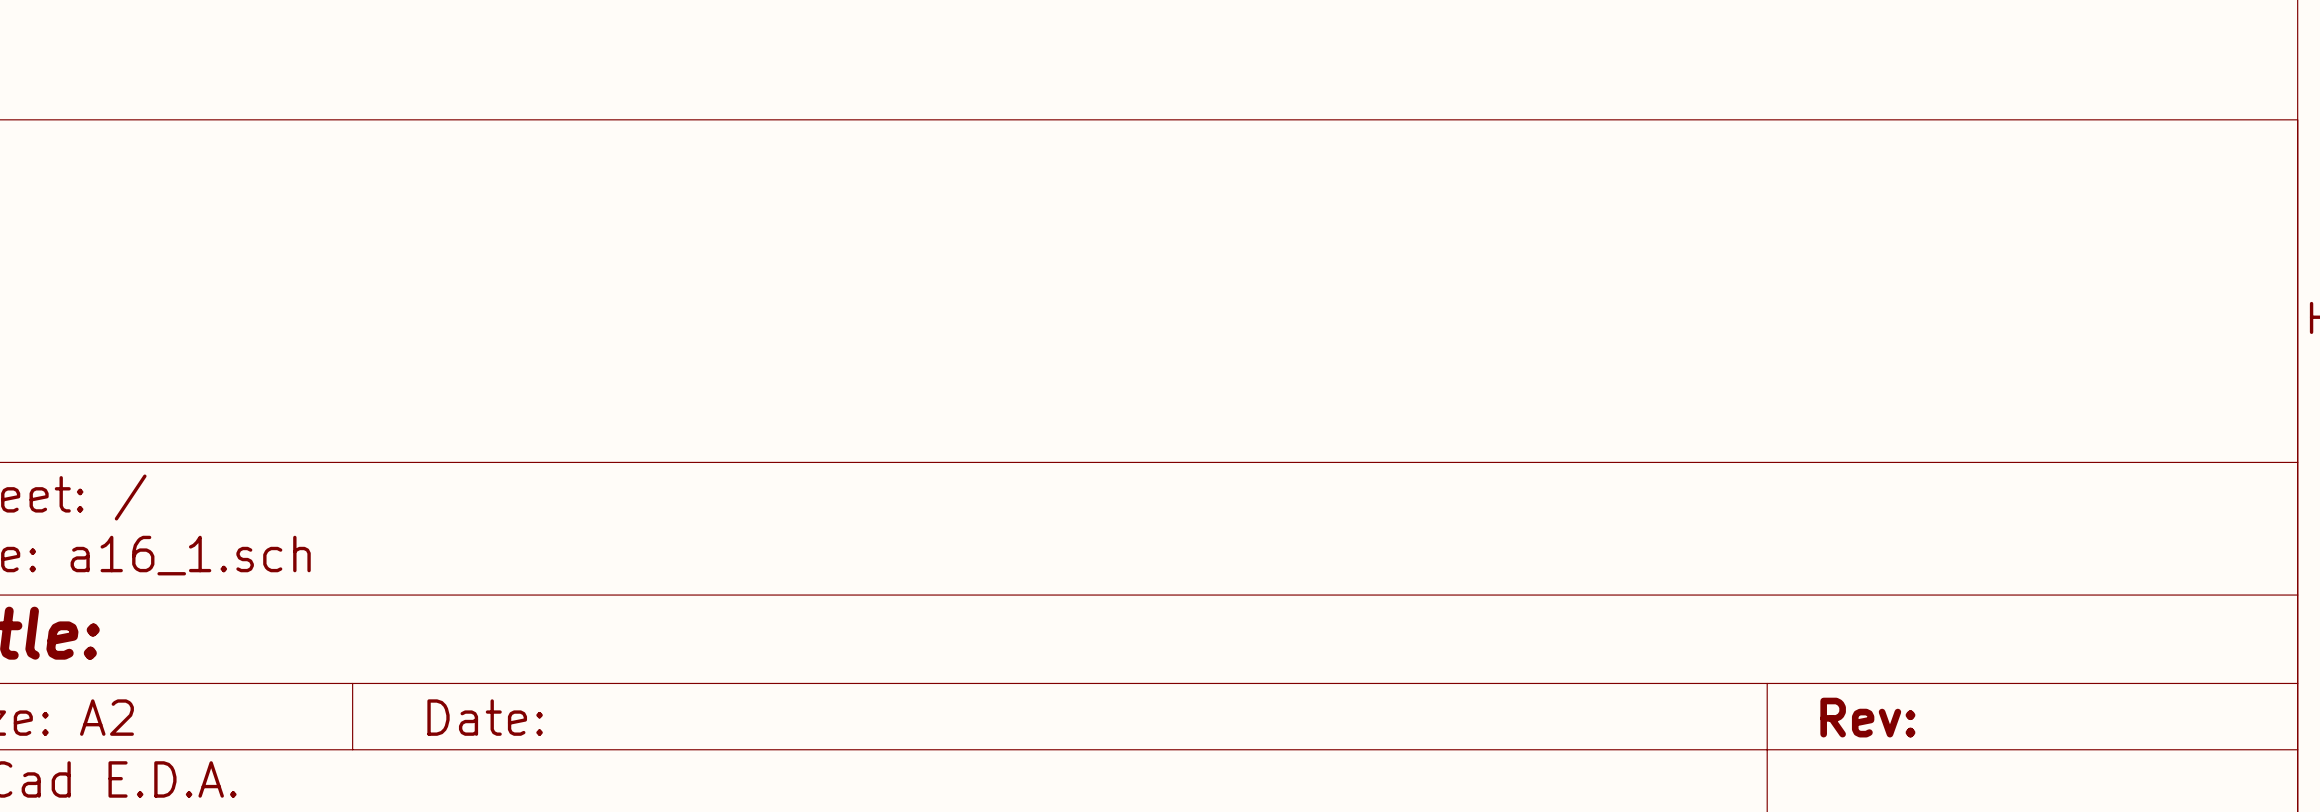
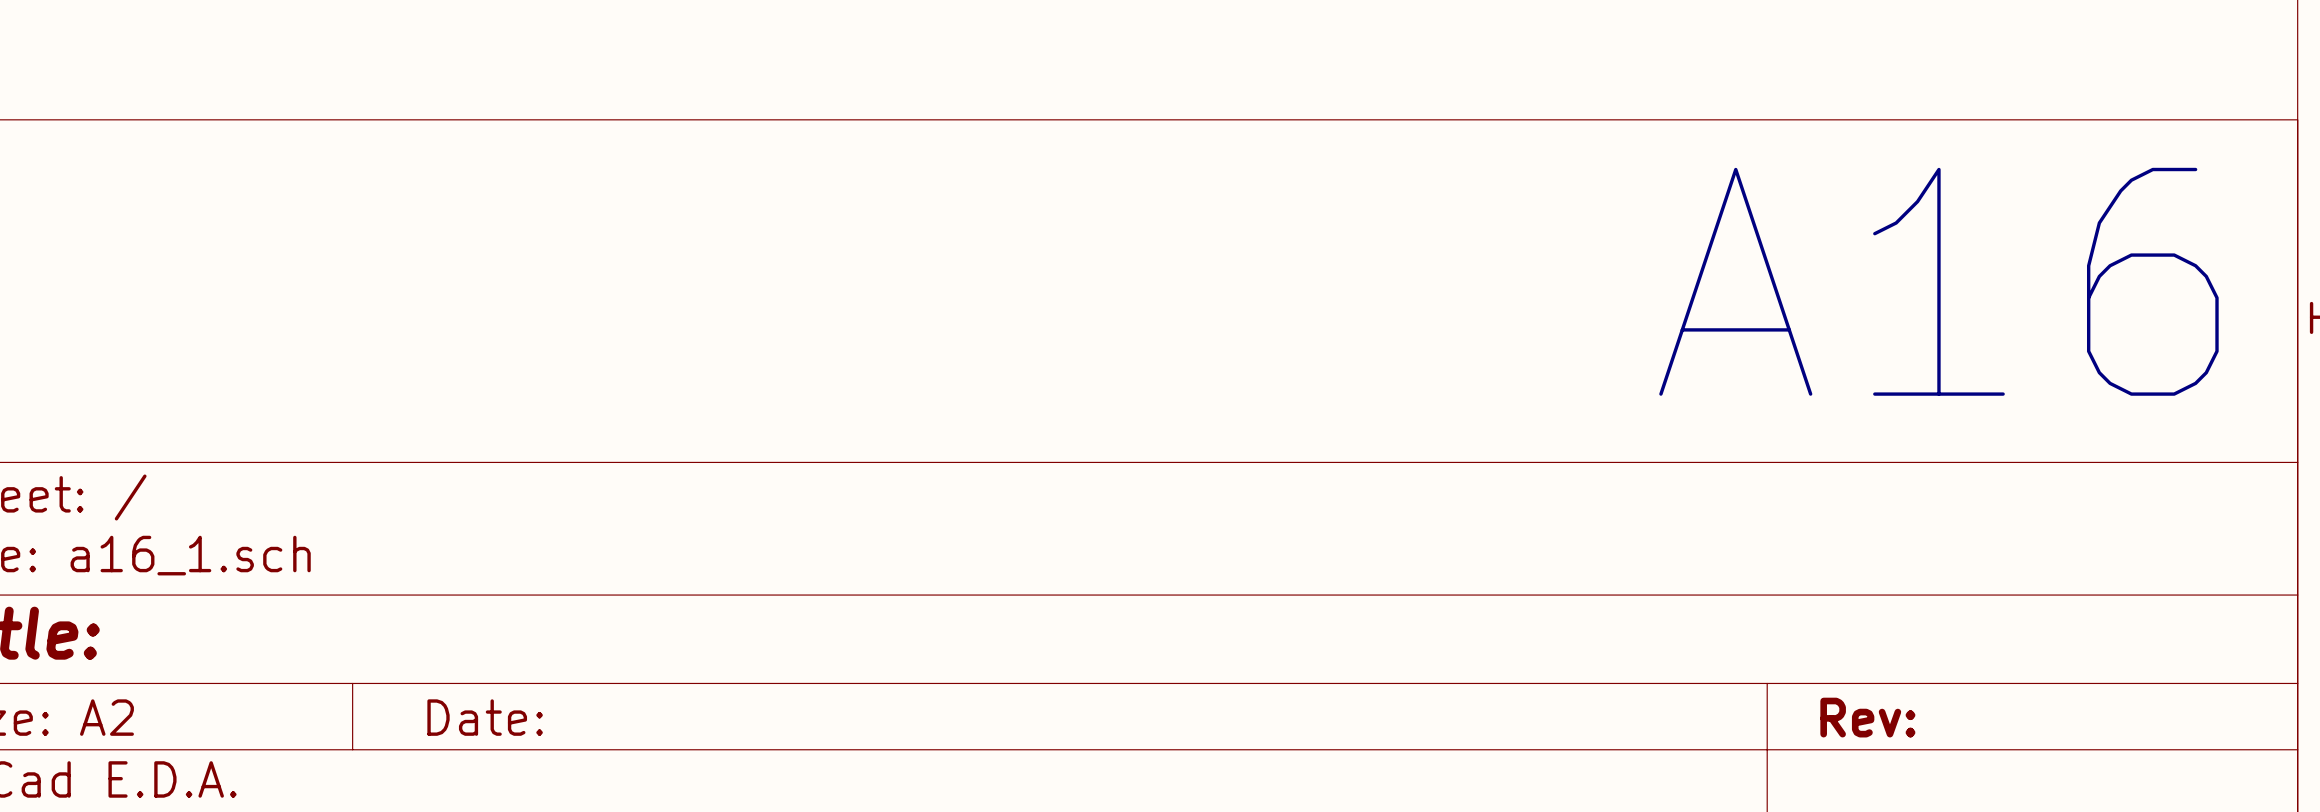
text: none -> A16 (1938, 281)

